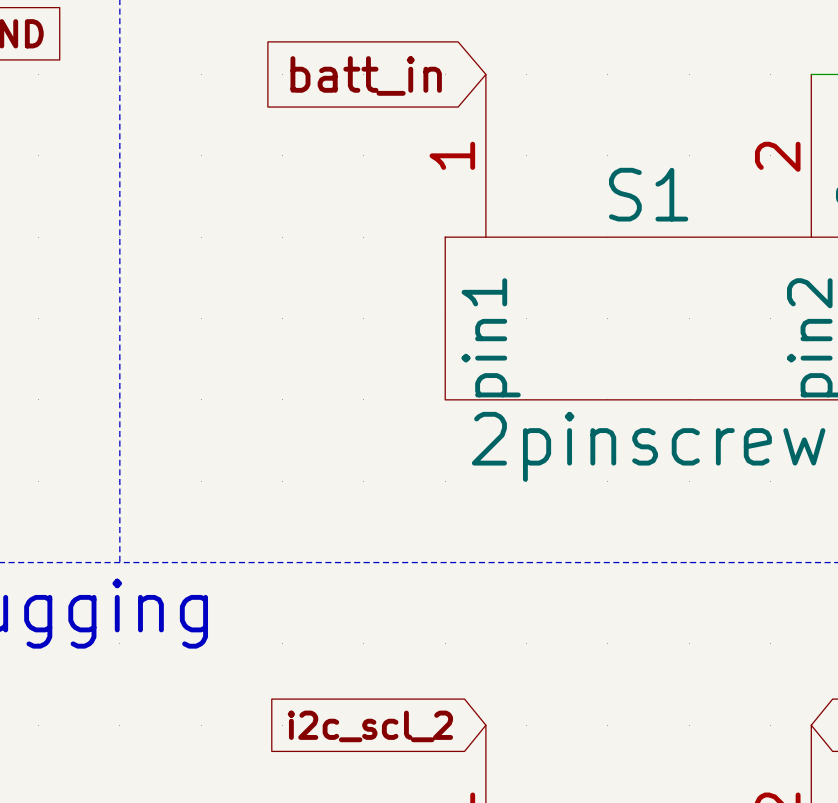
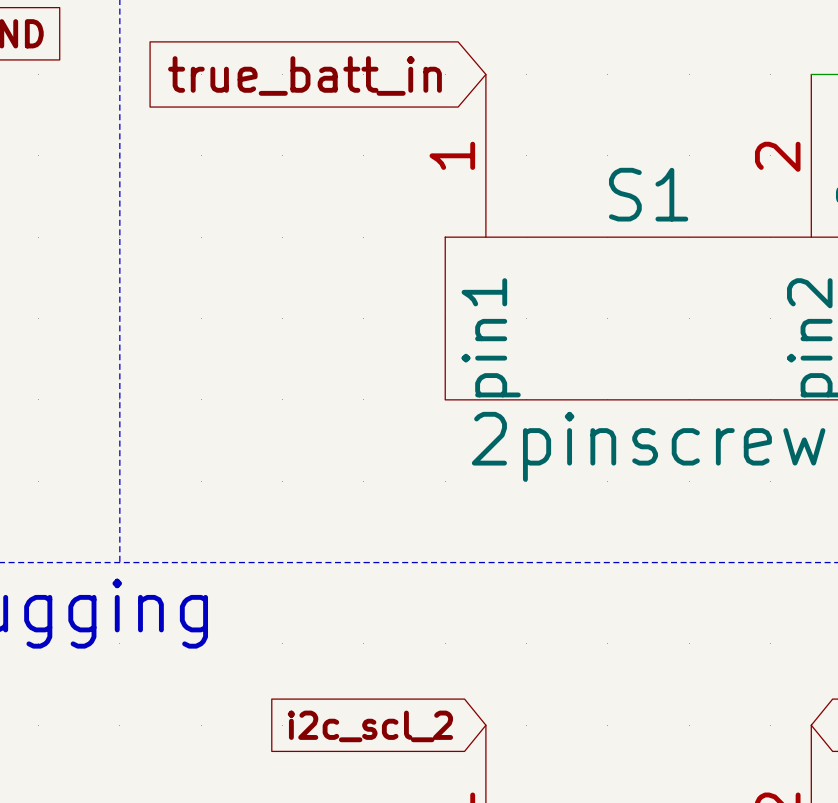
global label: batt_in (366, 75) -> true_batt_in (305, 75)

